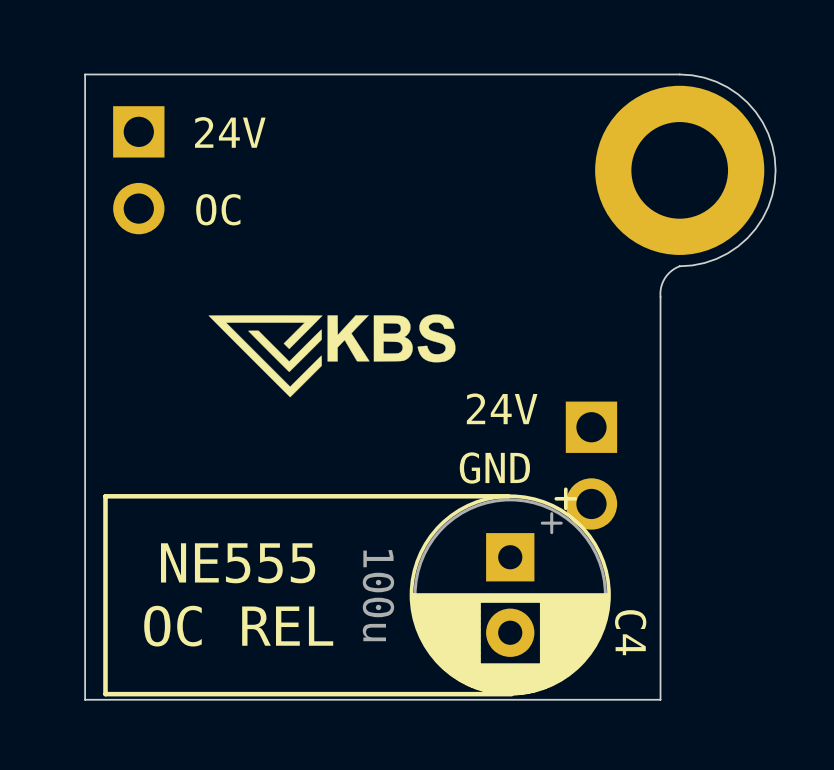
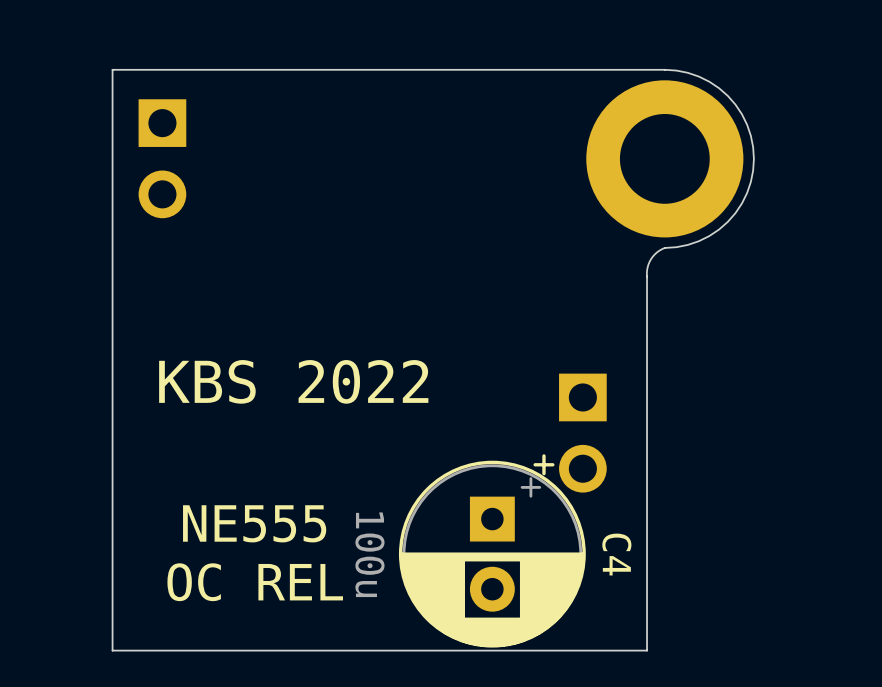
text: 24V (230, 132) -> none
text: OC (218, 209) -> none
drawing: [208, 314, 456, 398] -> none
text: 24V (502, 408) -> none
text: none -> KBS 2022 (293, 381)
text: GND (494, 468) -> none
line: (508, 496) (105, 496) (105, 694) (511, 694) -> none
C4 position: (510, 591) -> (492, 550)
C4 name position: C4 (630, 632) -> C4 (616, 554)

